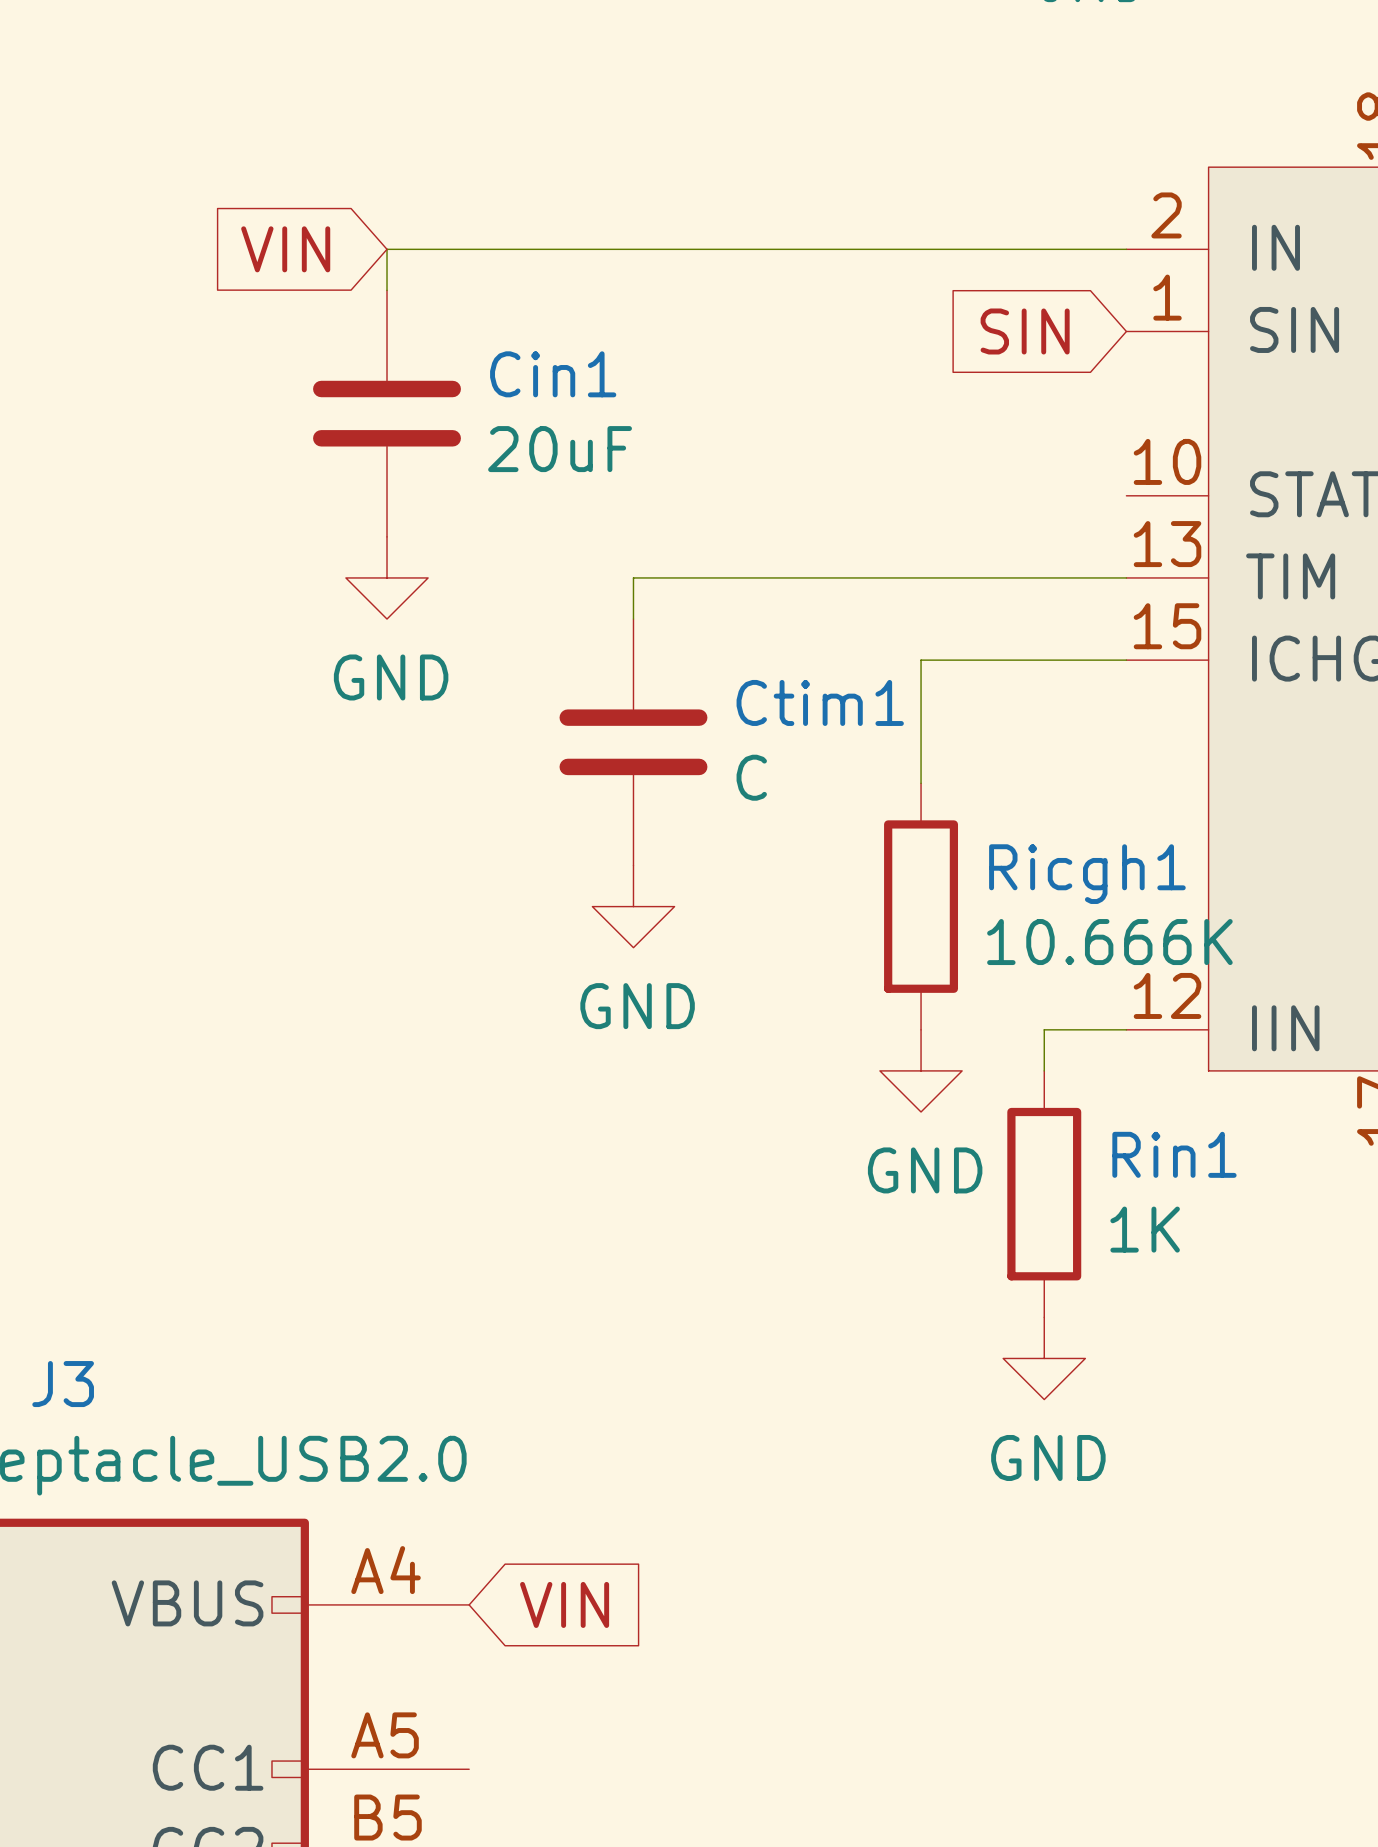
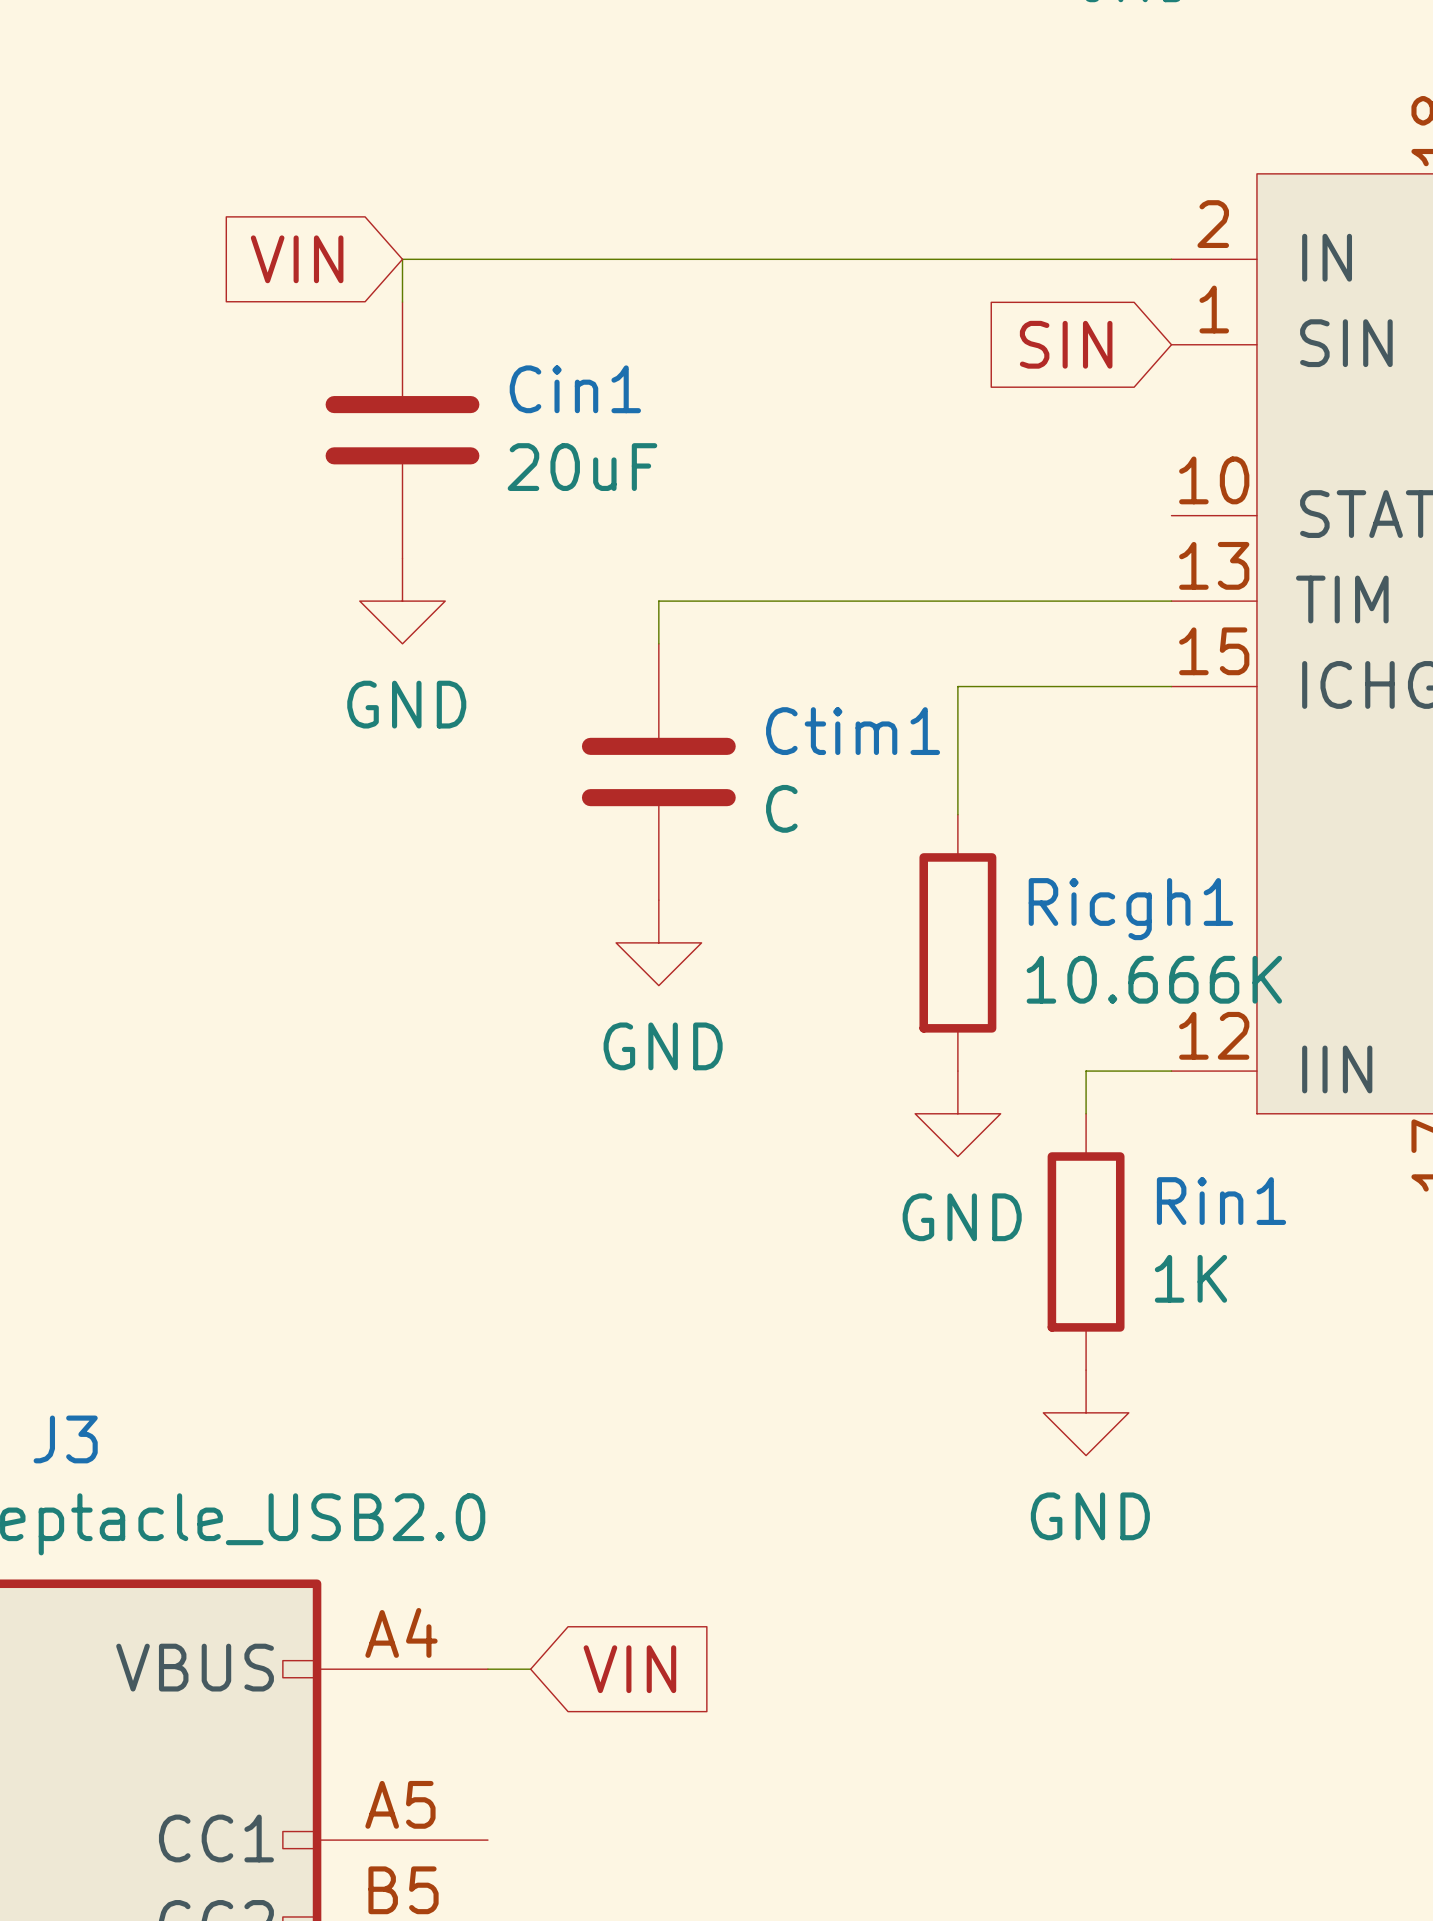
wire: none -> (487, 1669) (530, 1669)
global label position: VIN (564, 1604) -> VIN (629, 1669)

